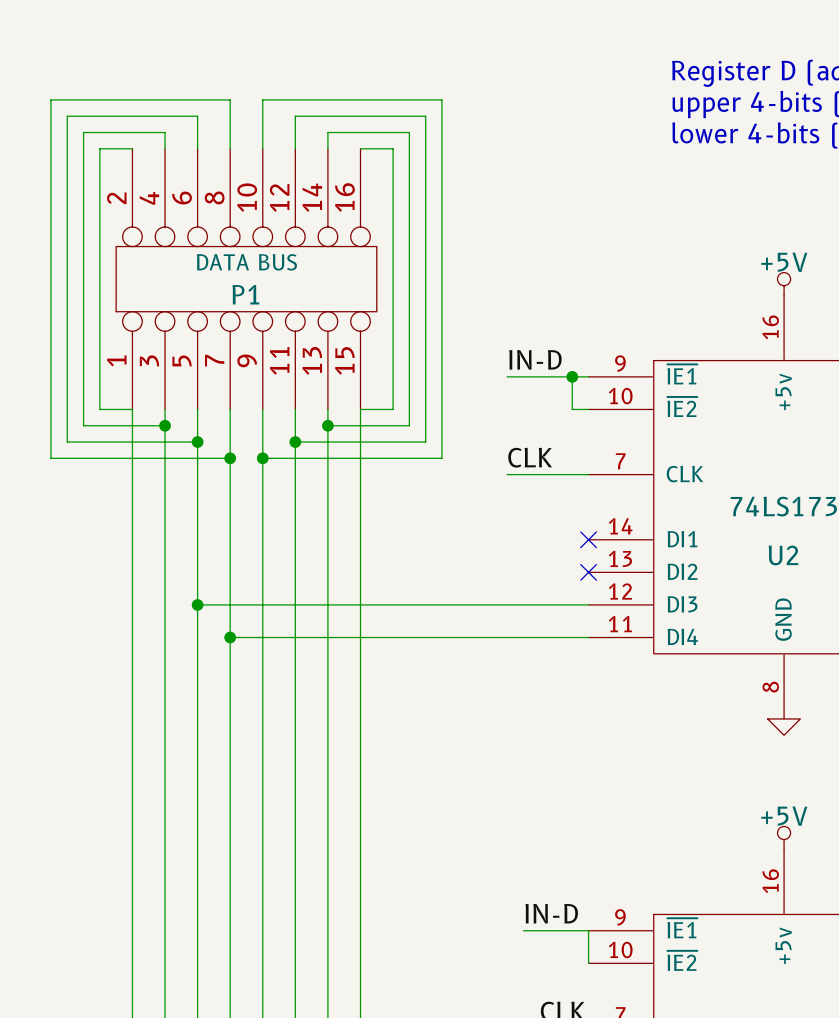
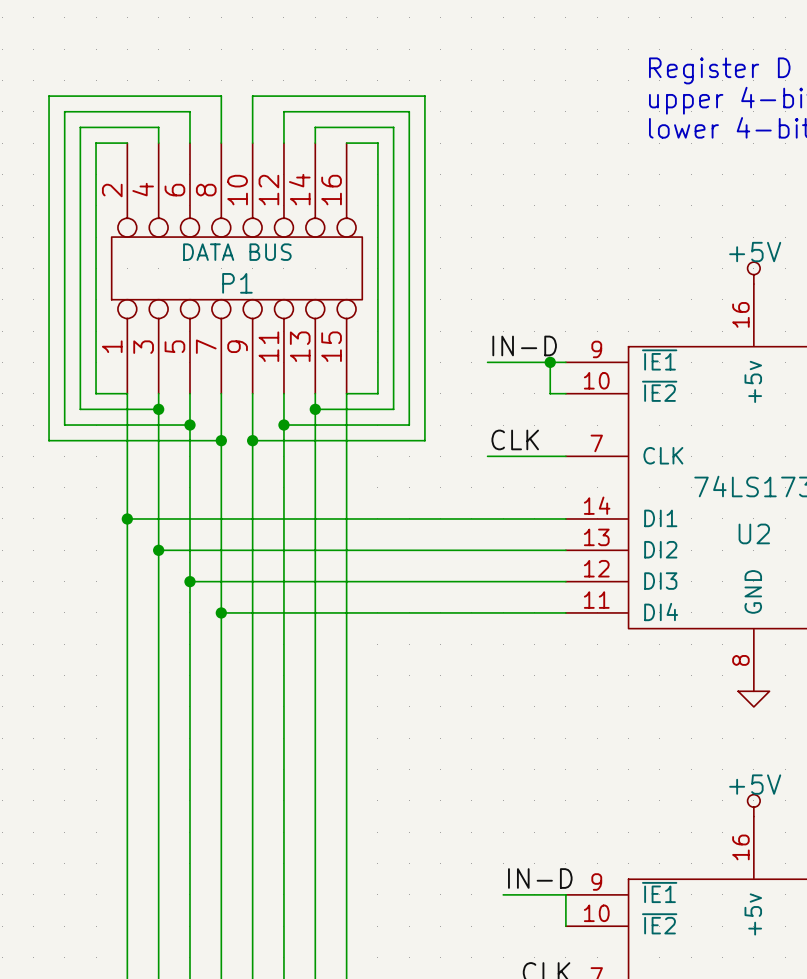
wire: none -> (127, 518) (565, 518)
junction: none -> (127, 518)
no-connect mark: (588, 539) -> none
wire: none -> (158, 550) (565, 550)
junction: none -> (158, 550)
no-connect mark: (588, 572) -> none

